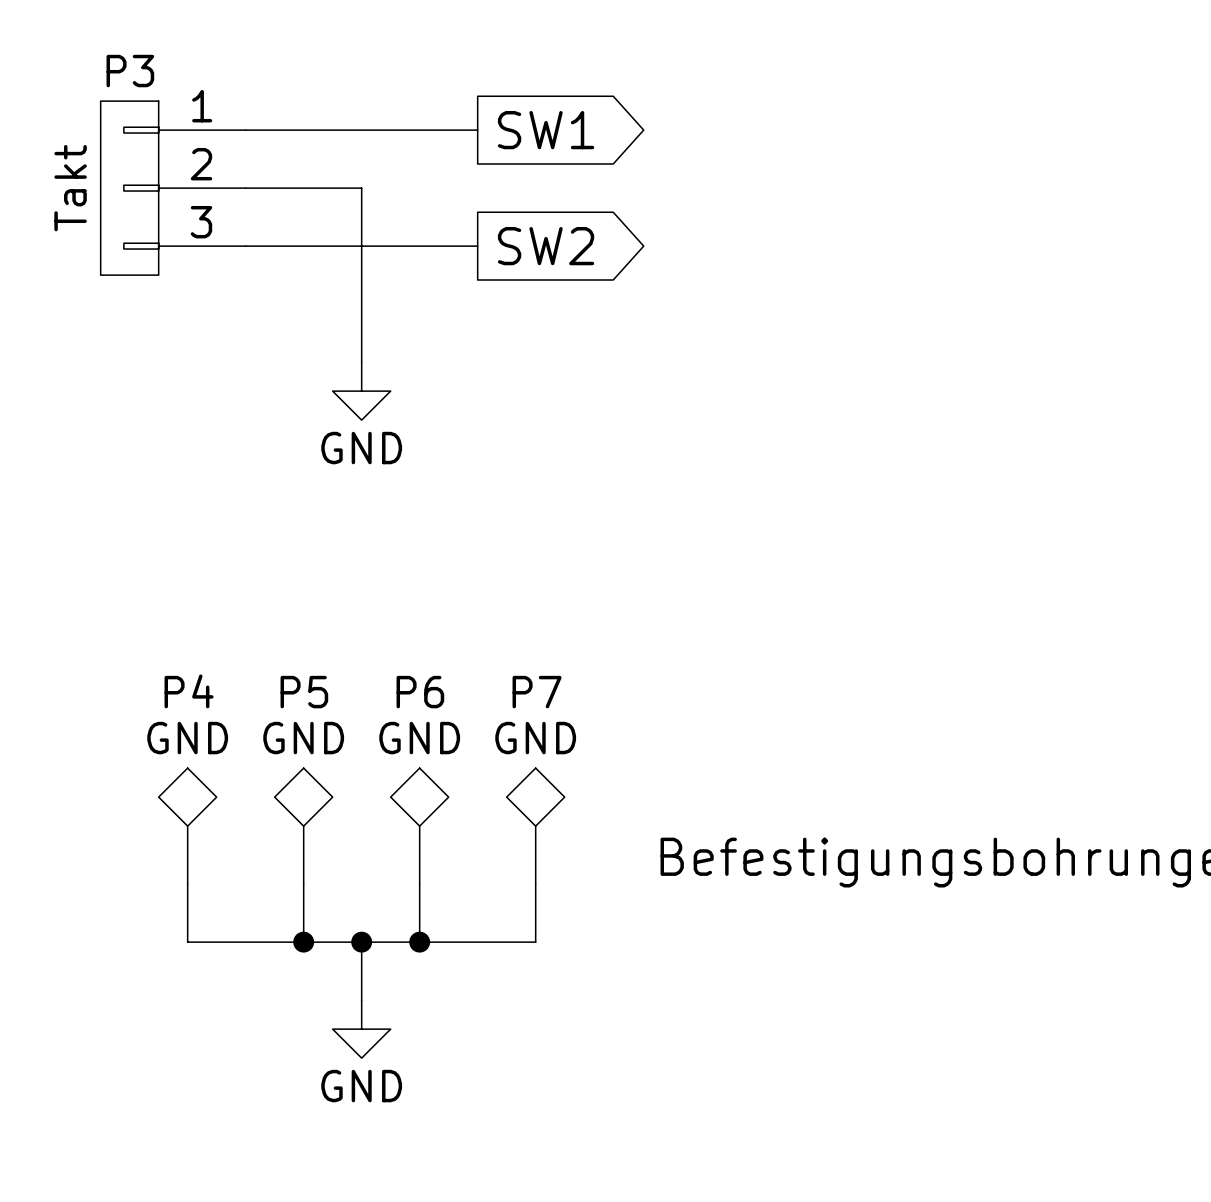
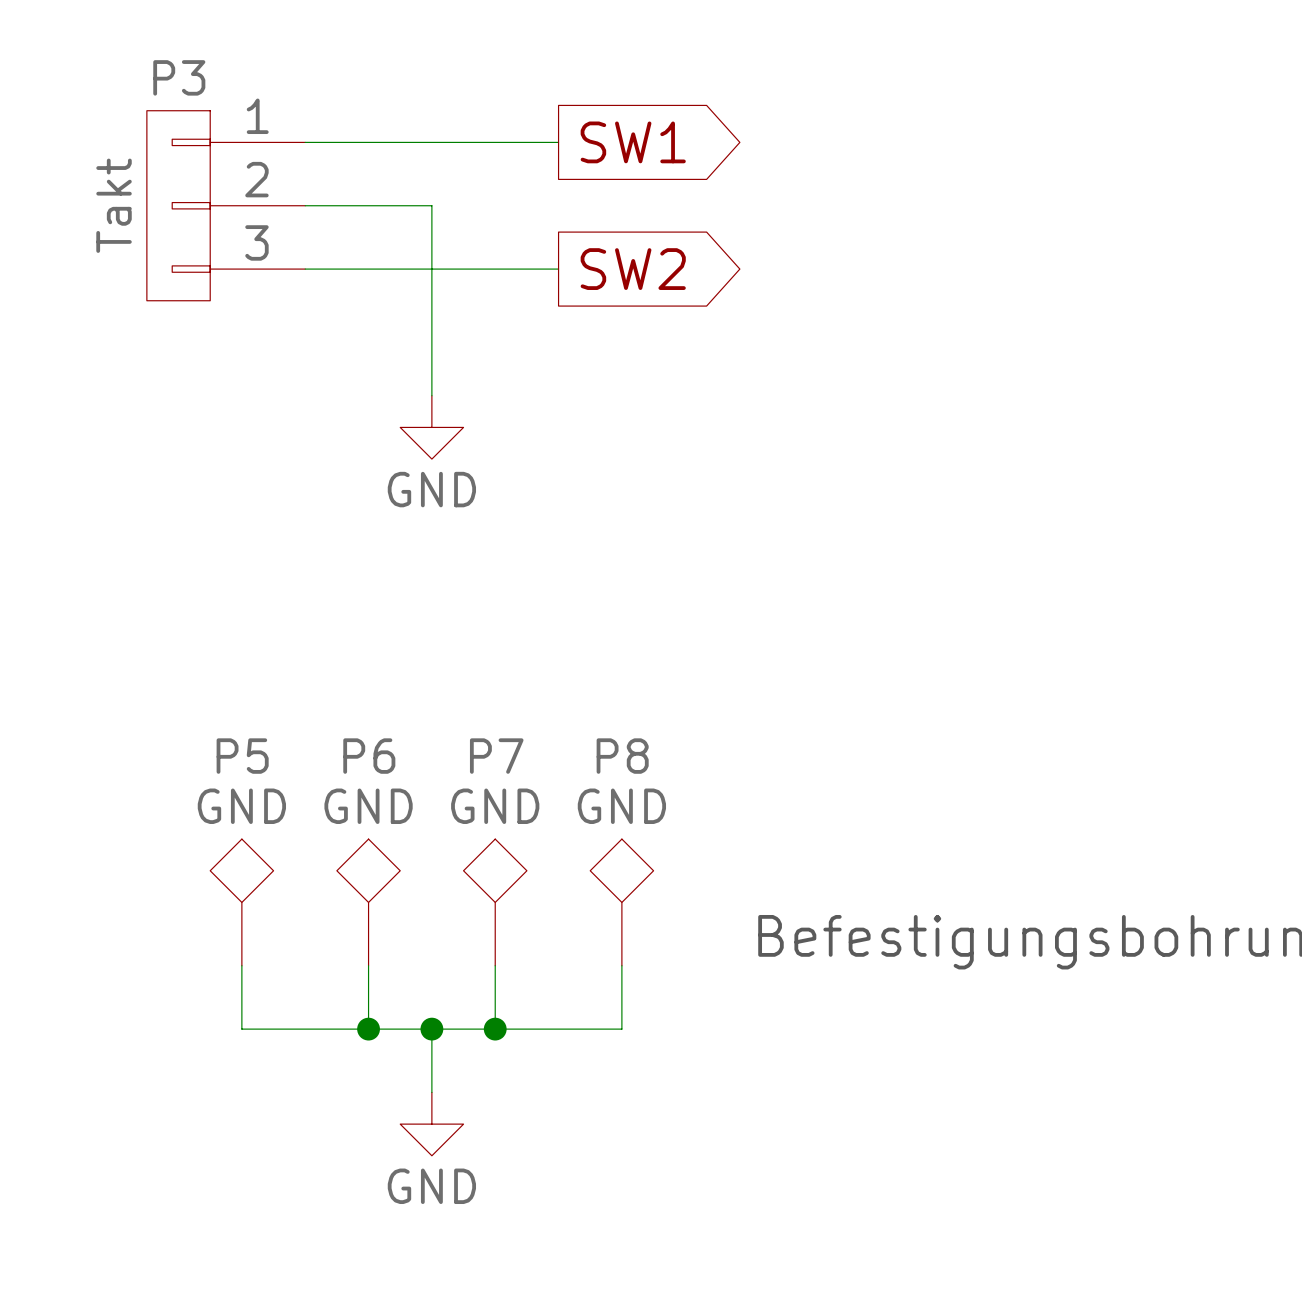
P4 name: P4 (189, 691) -> P5 (242, 756)
P5 name: P5 (304, 692) -> P6 (369, 756)
P6 name: P6 (420, 692) -> P7 (496, 756)
P7 name: P7 (537, 692) -> P8 (622, 756)

